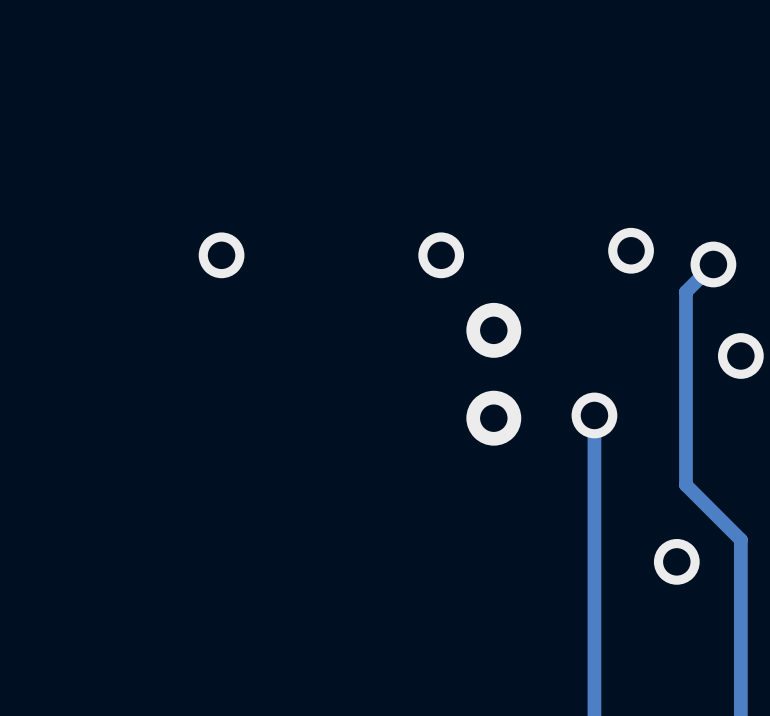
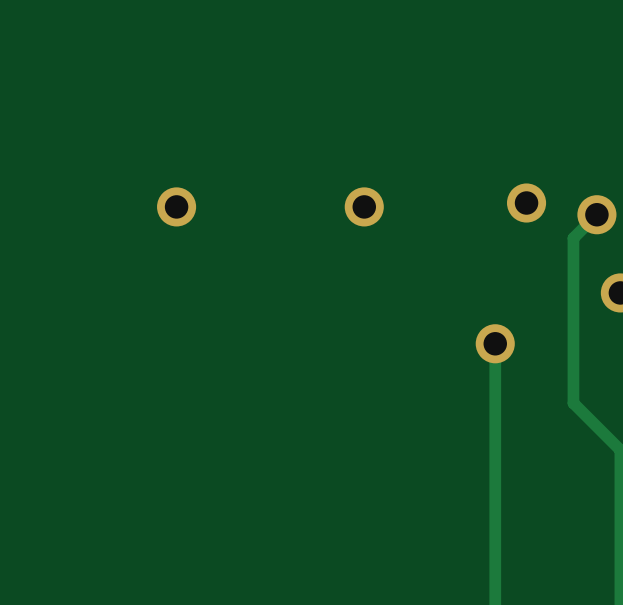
via: (493, 330) -> none
via: (493, 418) -> none
via: (676, 561) -> none

